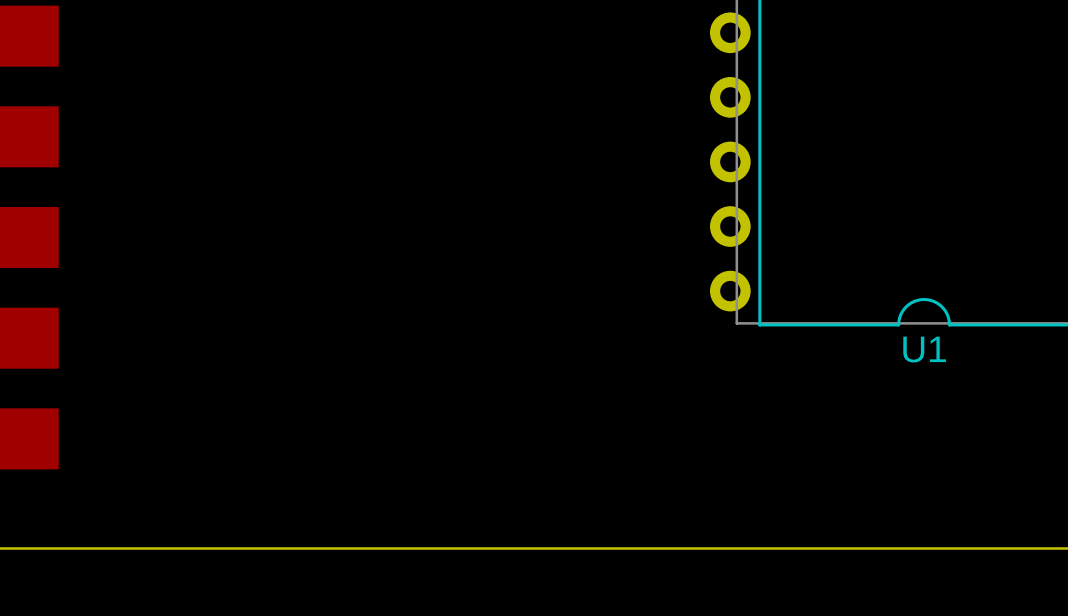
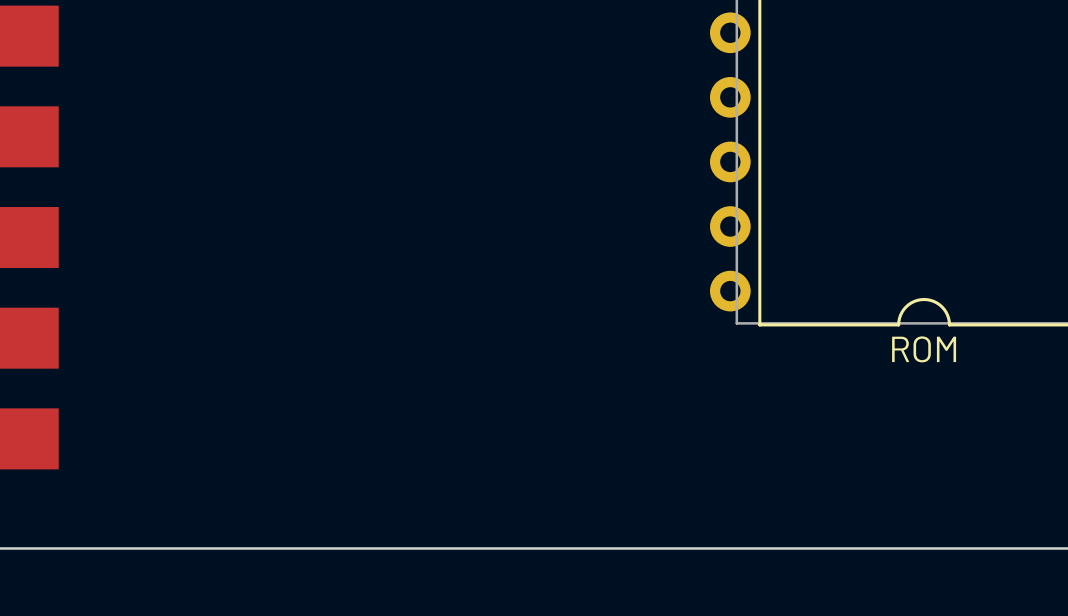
U1 name: U1 (924, 349) -> ROM (924, 349)

